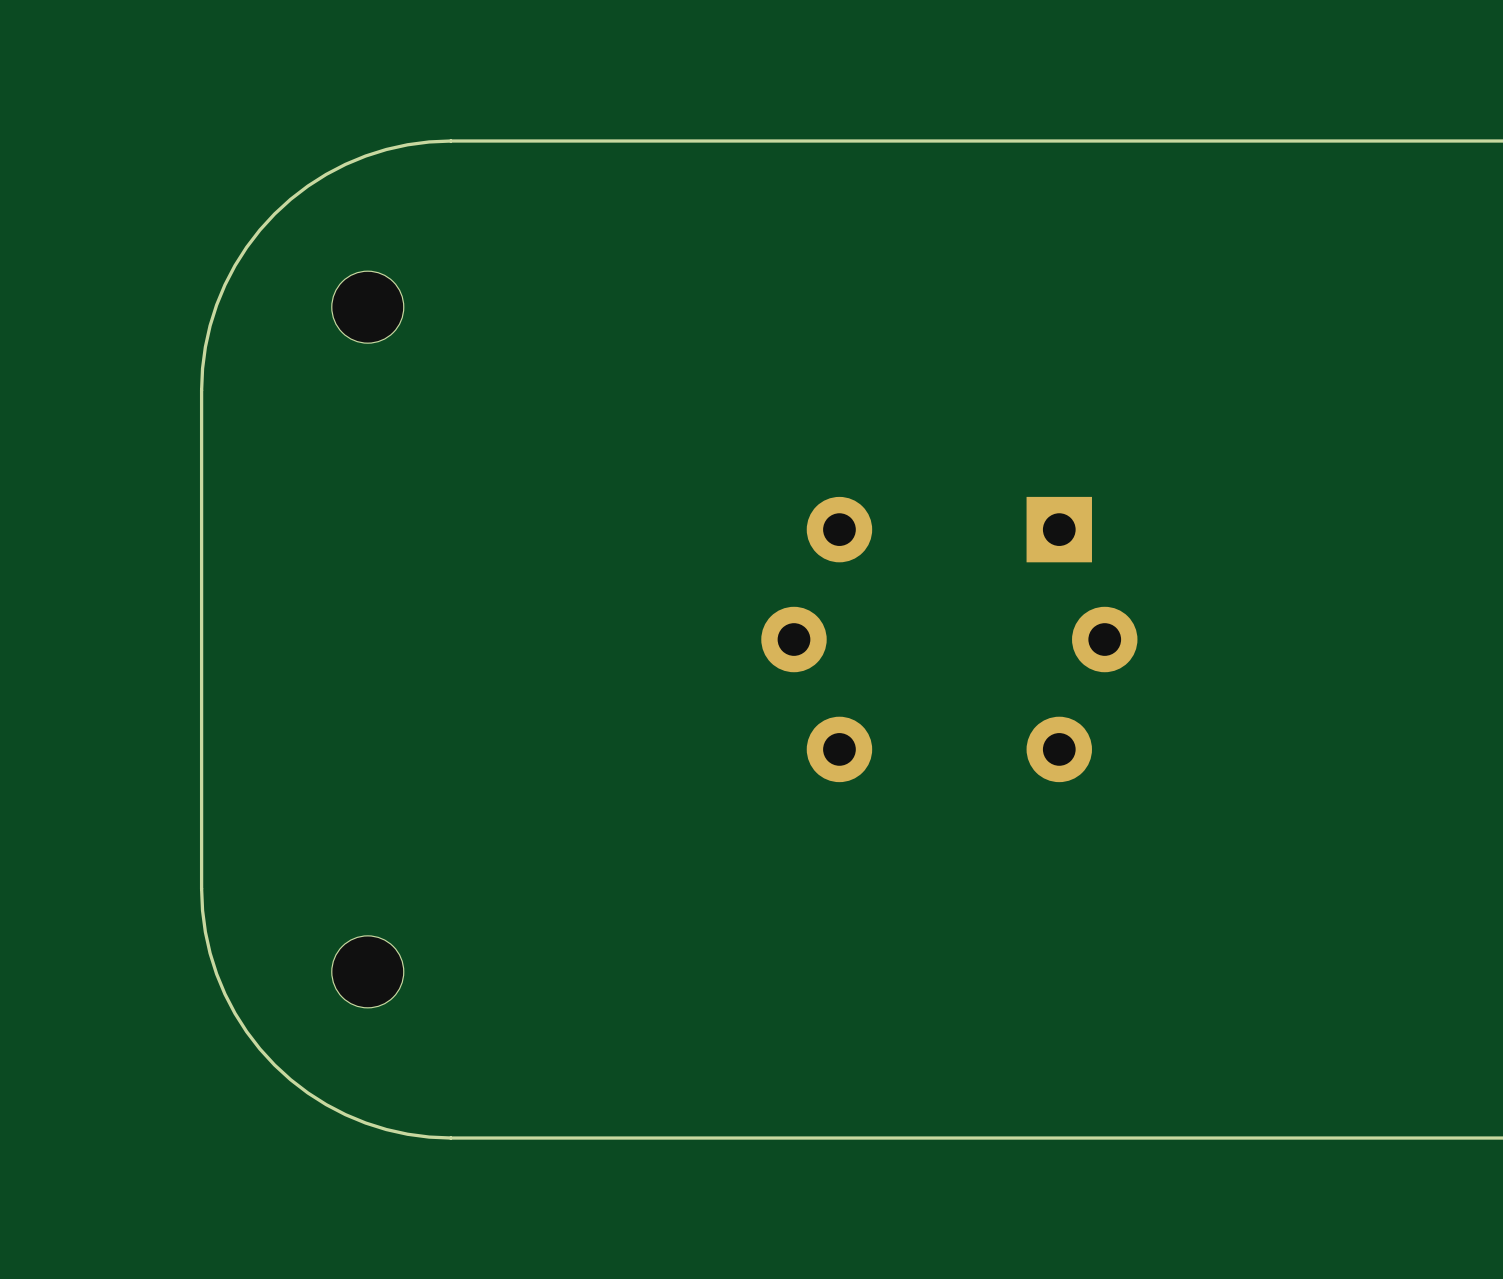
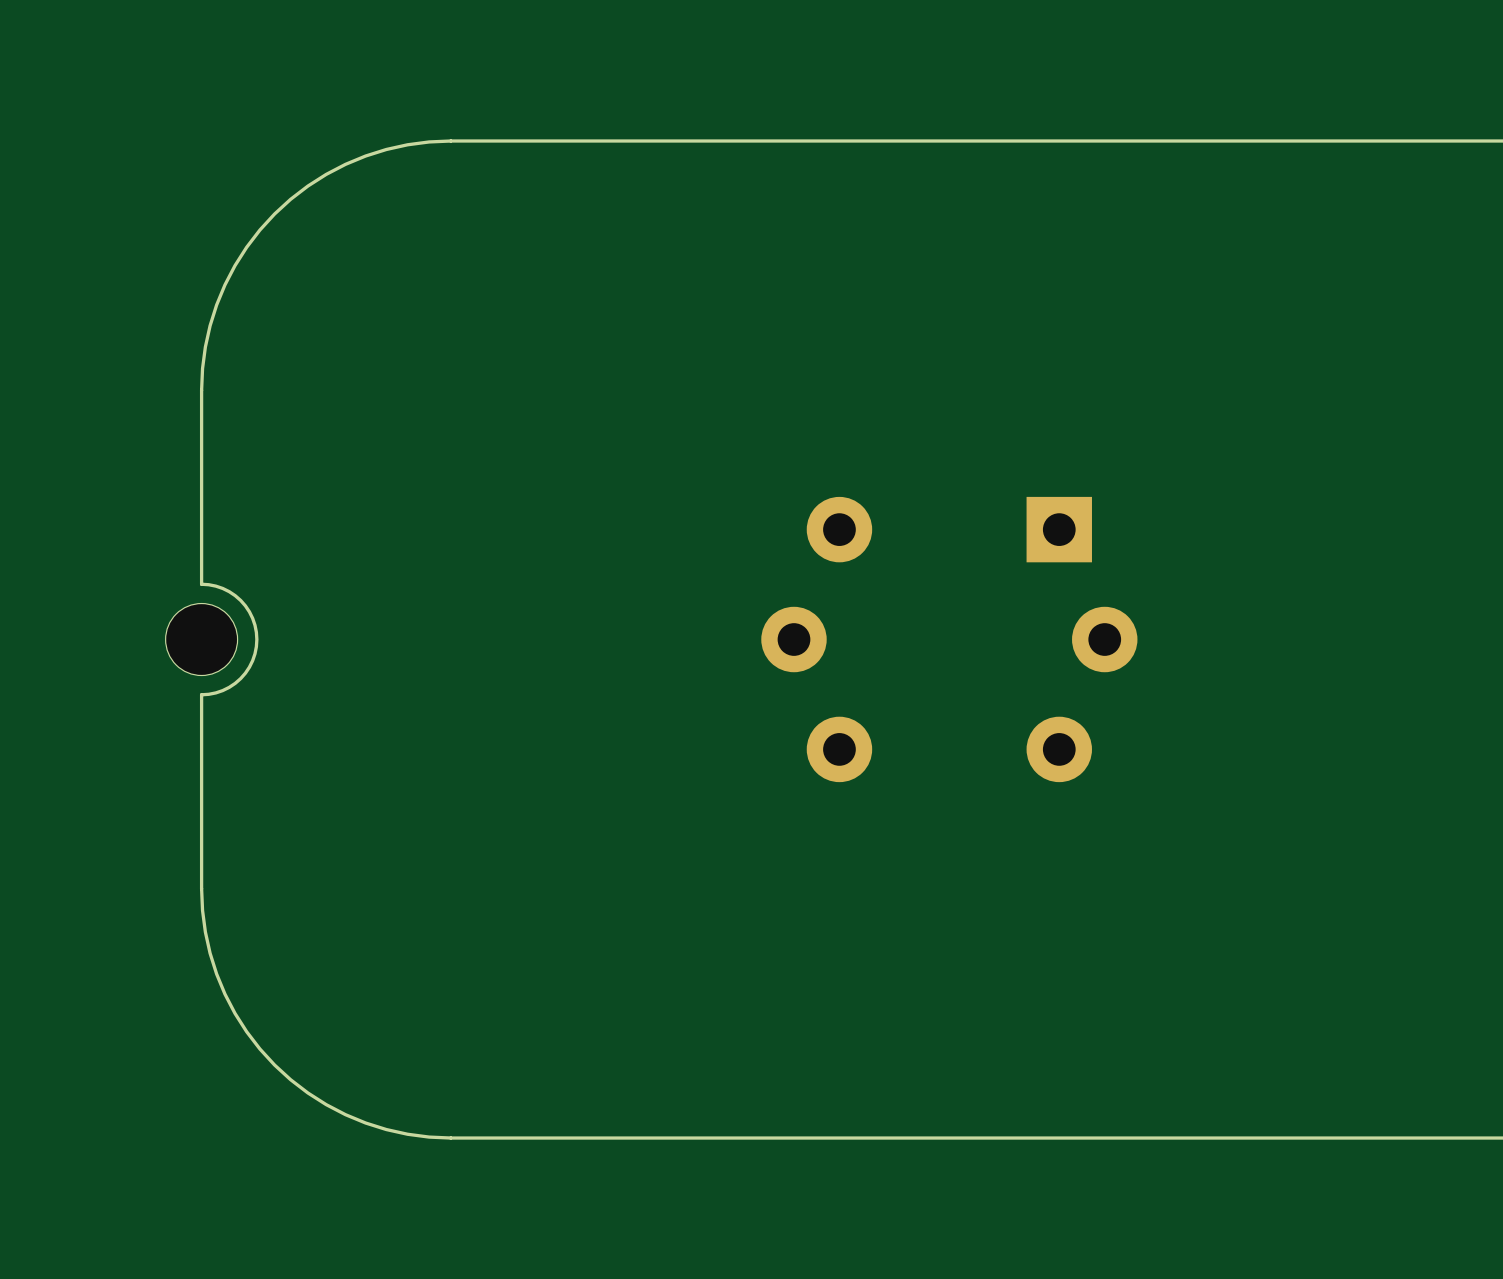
part: (367, 307) -> none
board edge: (201, 584) (201, 694) -> (201, 584) (222, 588) (240, 600) (252, 618) (256, 639) (252, 660) (240, 678) (222, 690) (201, 694)
part: none -> (201, 639)
part: (367, 971) -> none

